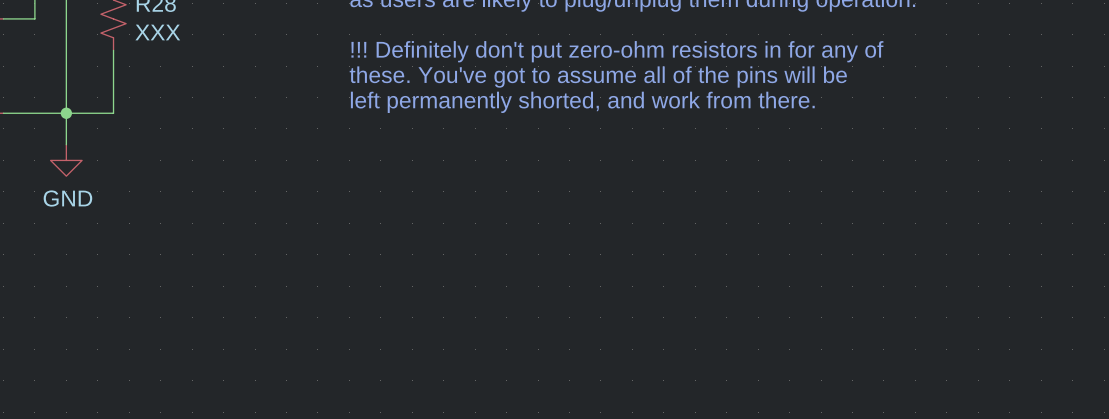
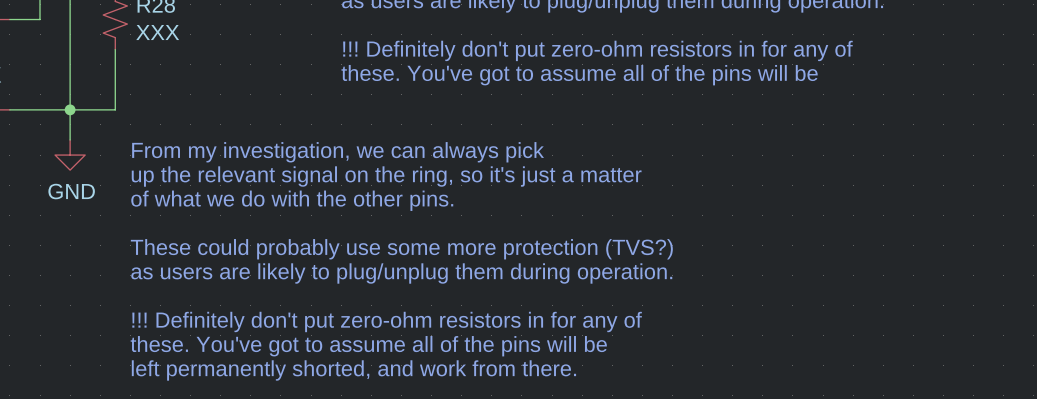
text: left permanently shorted, and work from there. (582, 102) -> none
text: none -> From my investigation, we can always pick (338, 152)
text: none -> up the relevant signal on the ring, so it's just a matter (386, 176)
text: none -> of what we do with the other pins. (292, 200)
text: none -> These could probably use some more protection (TVS?) (401, 249)
text: none -> as users are likely to plug/unplug them during operation. (401, 273)
text: none -> !!! Definitely don't put zero-ohm resistors in for any of (387, 321)
text: none -> these. You've got to assume all of the pins will be (368, 346)
text: none -> left permanently shorted, and work from there. (353, 370)

